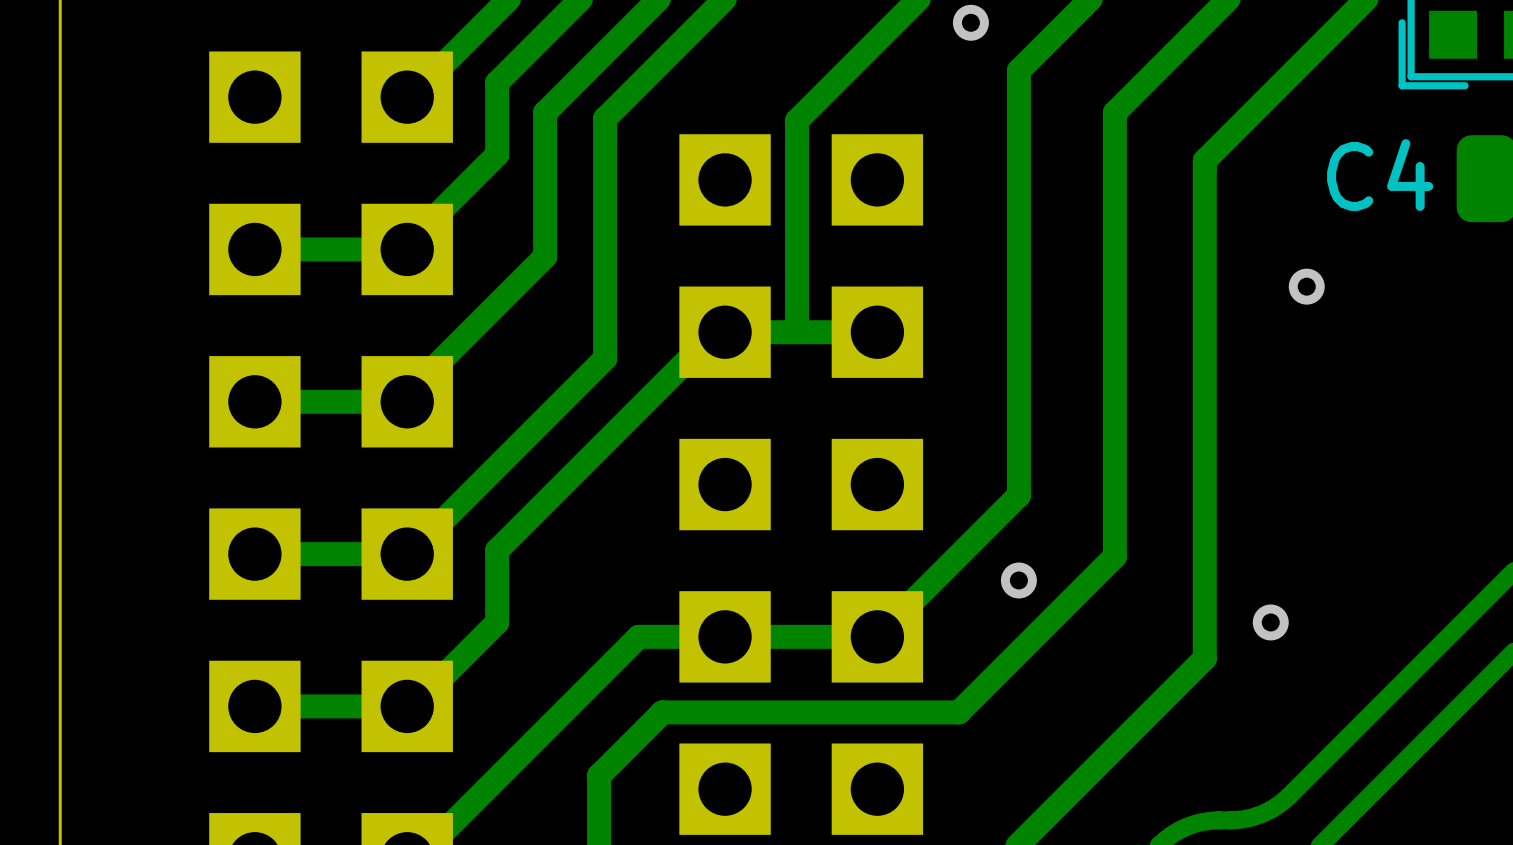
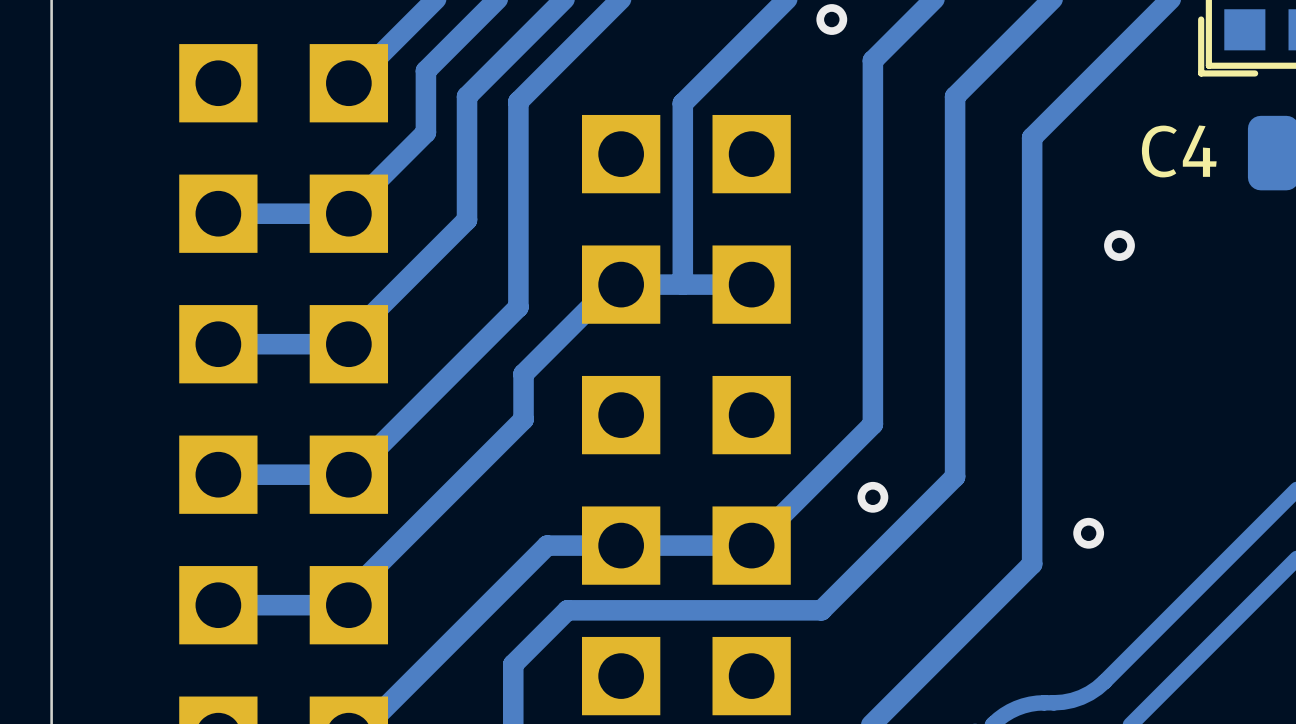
track: (611, 436) (497, 550) (497, 622) (413, 706) (394, 706) -> (523, 374) (523, 419) (337, 605)

